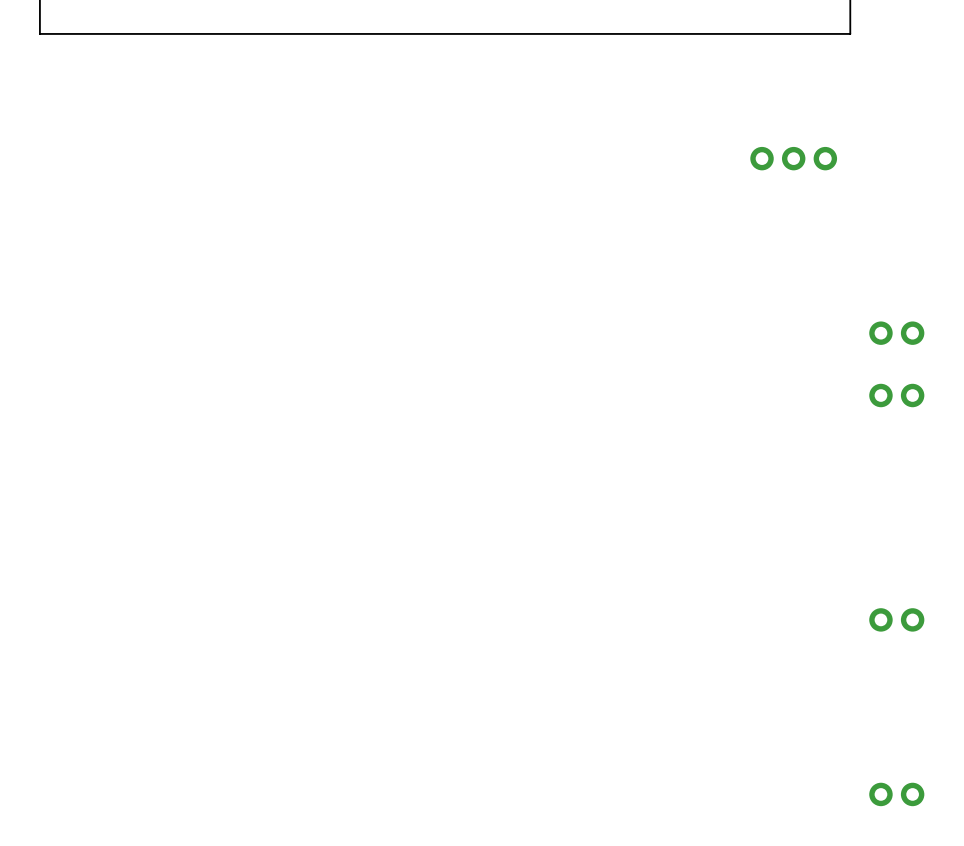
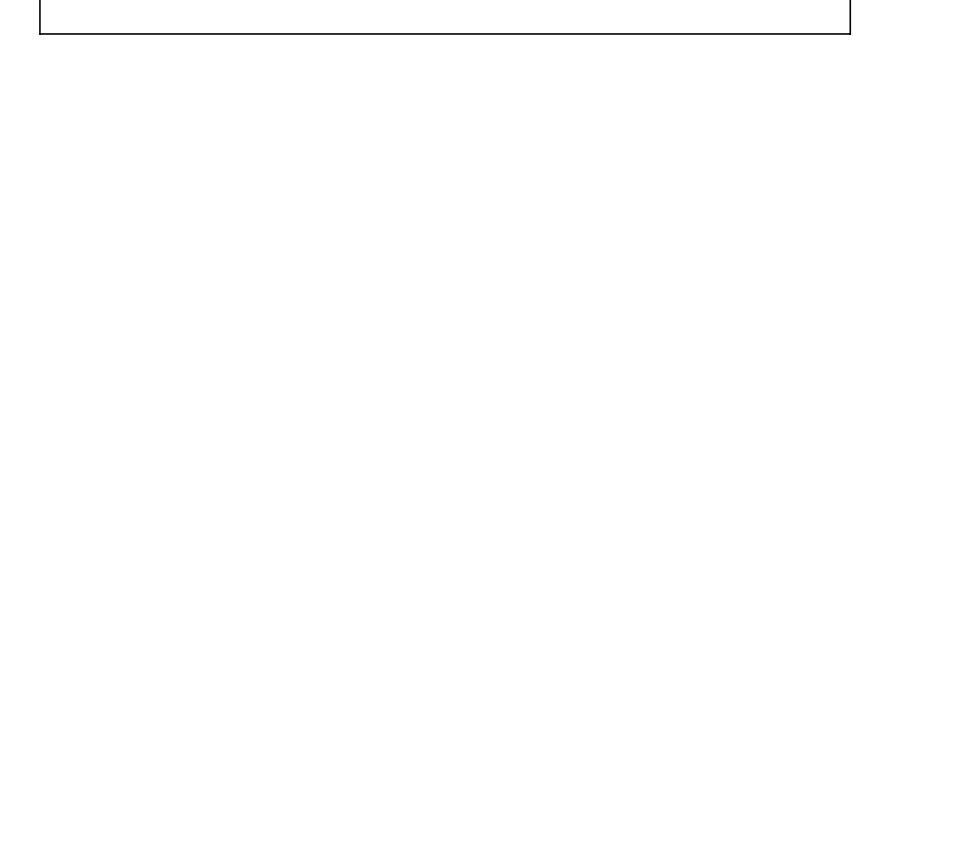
part: (793, 158) -> none
part: (896, 333) -> none
part: (896, 395) -> none
part: (896, 619) -> none
part: (896, 794) -> none

